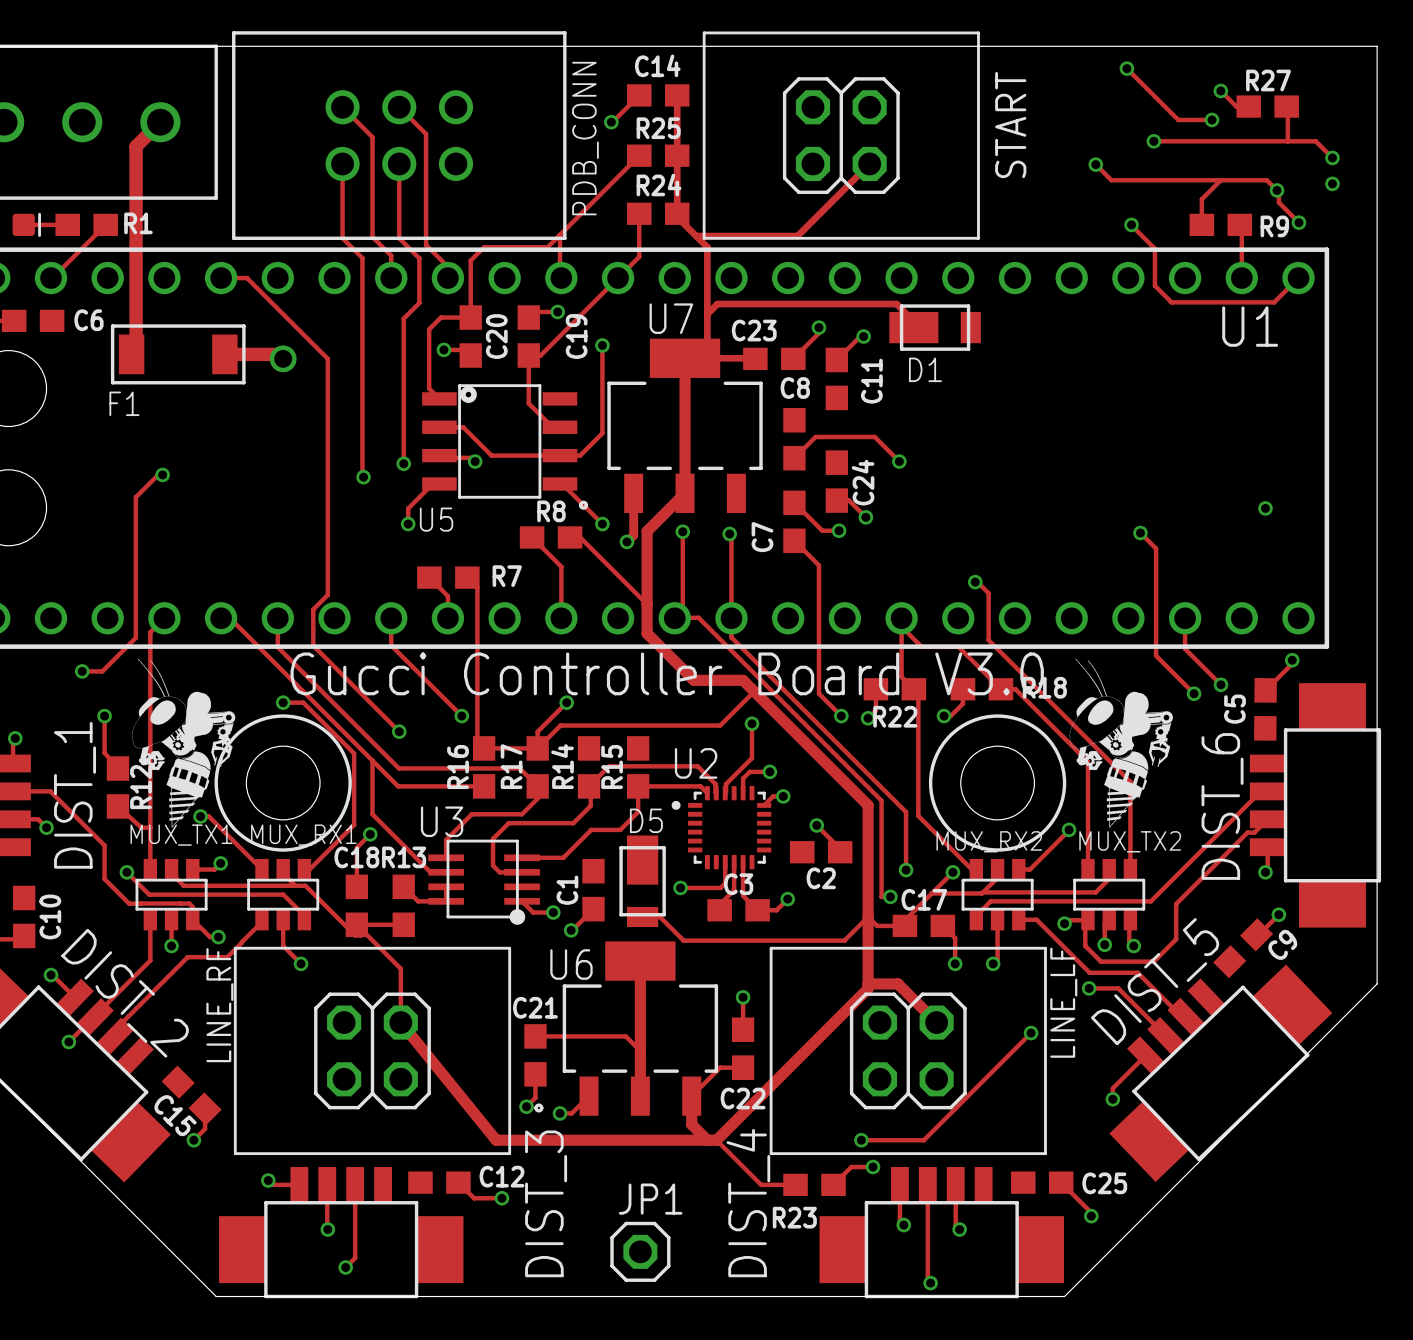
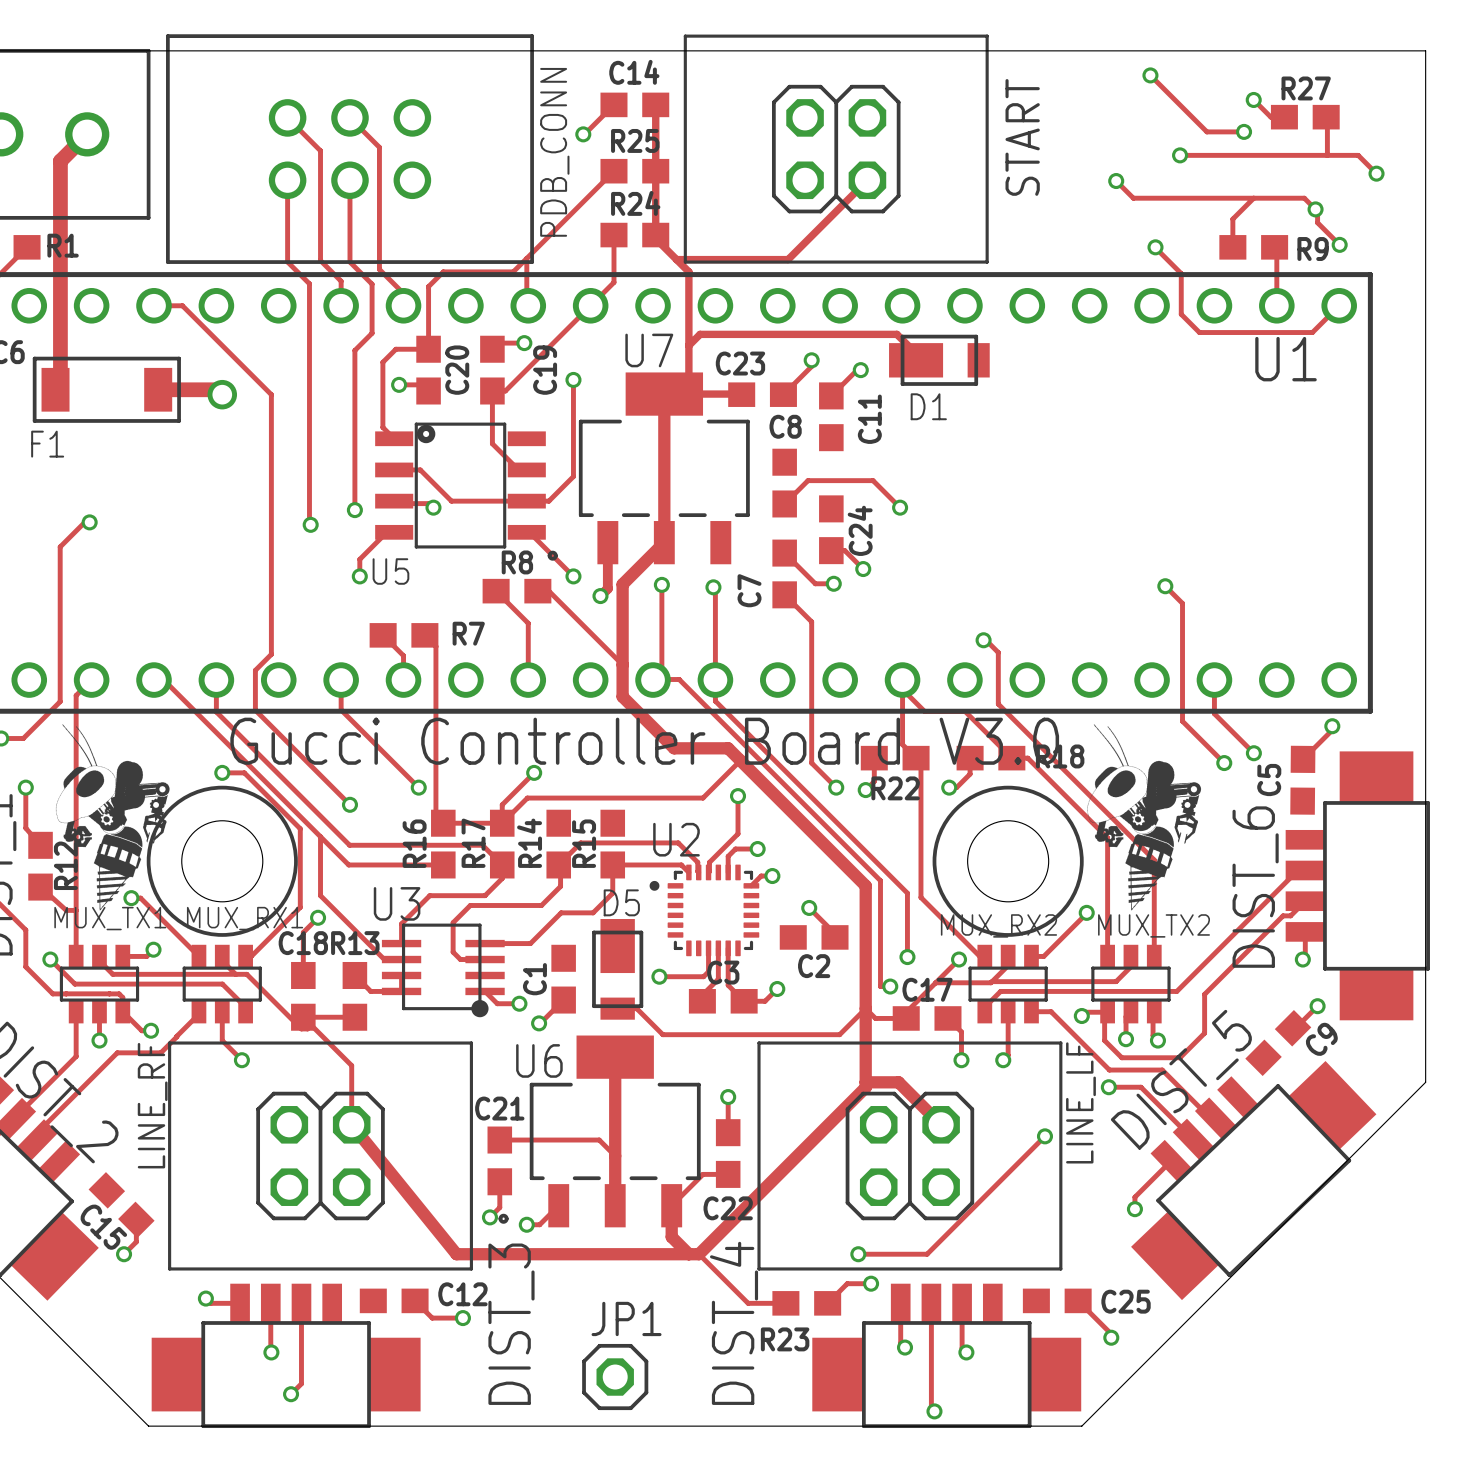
via: (1332, 183) -> none
via: (1265, 508) -> none

